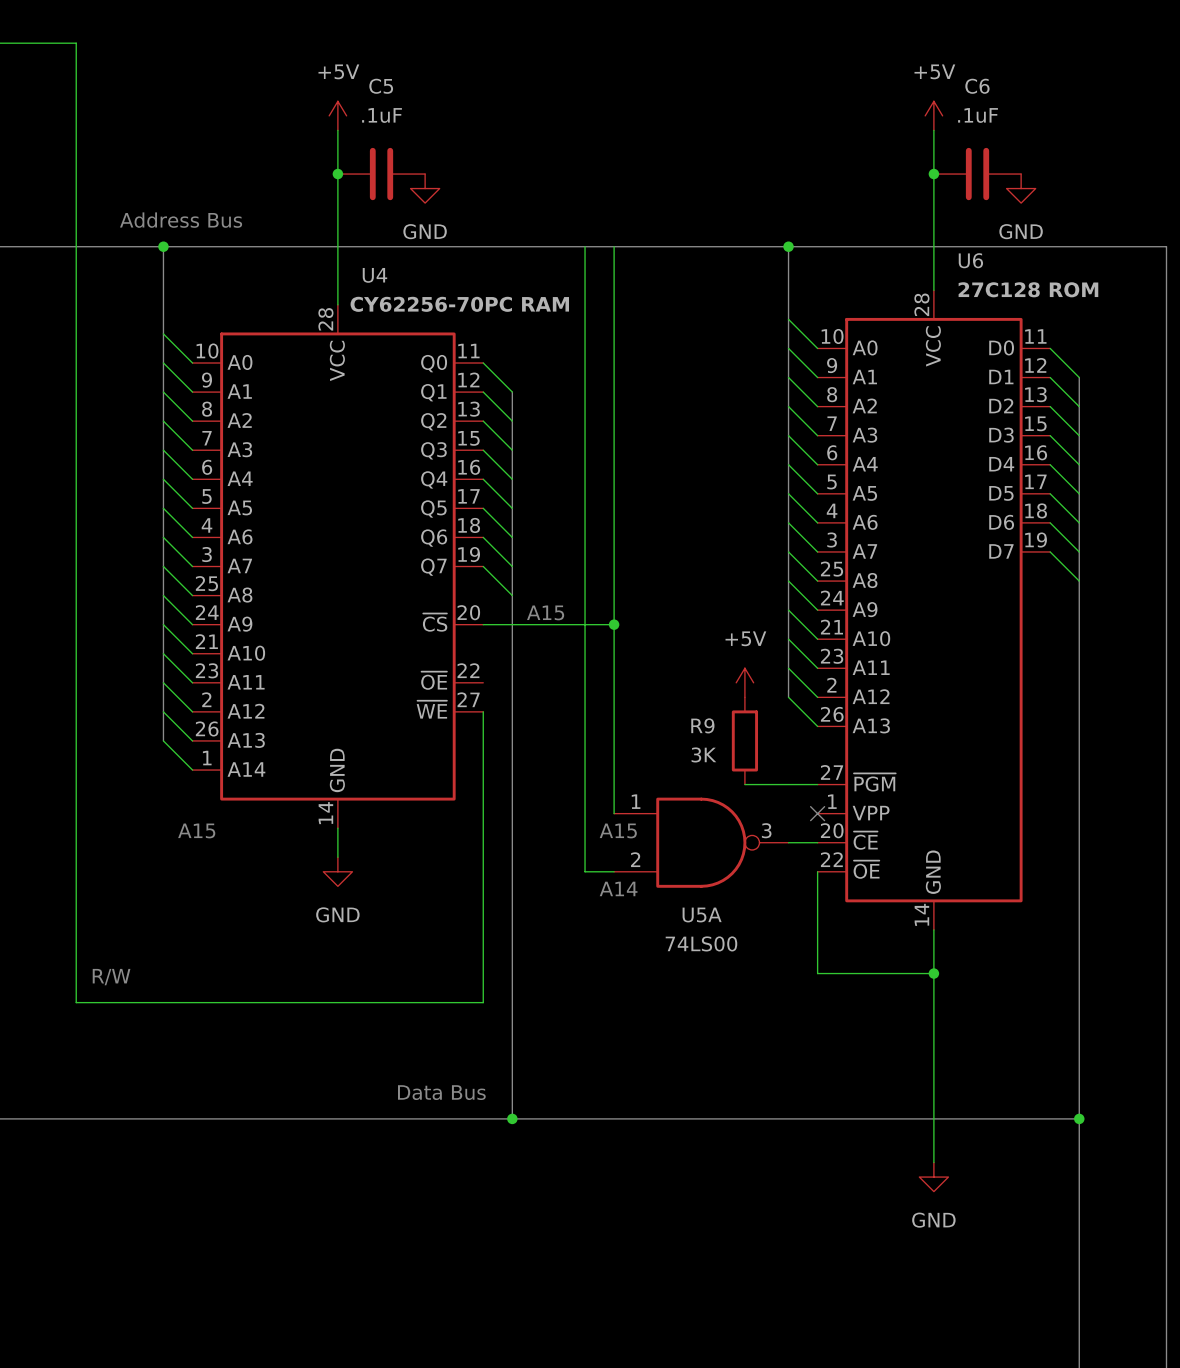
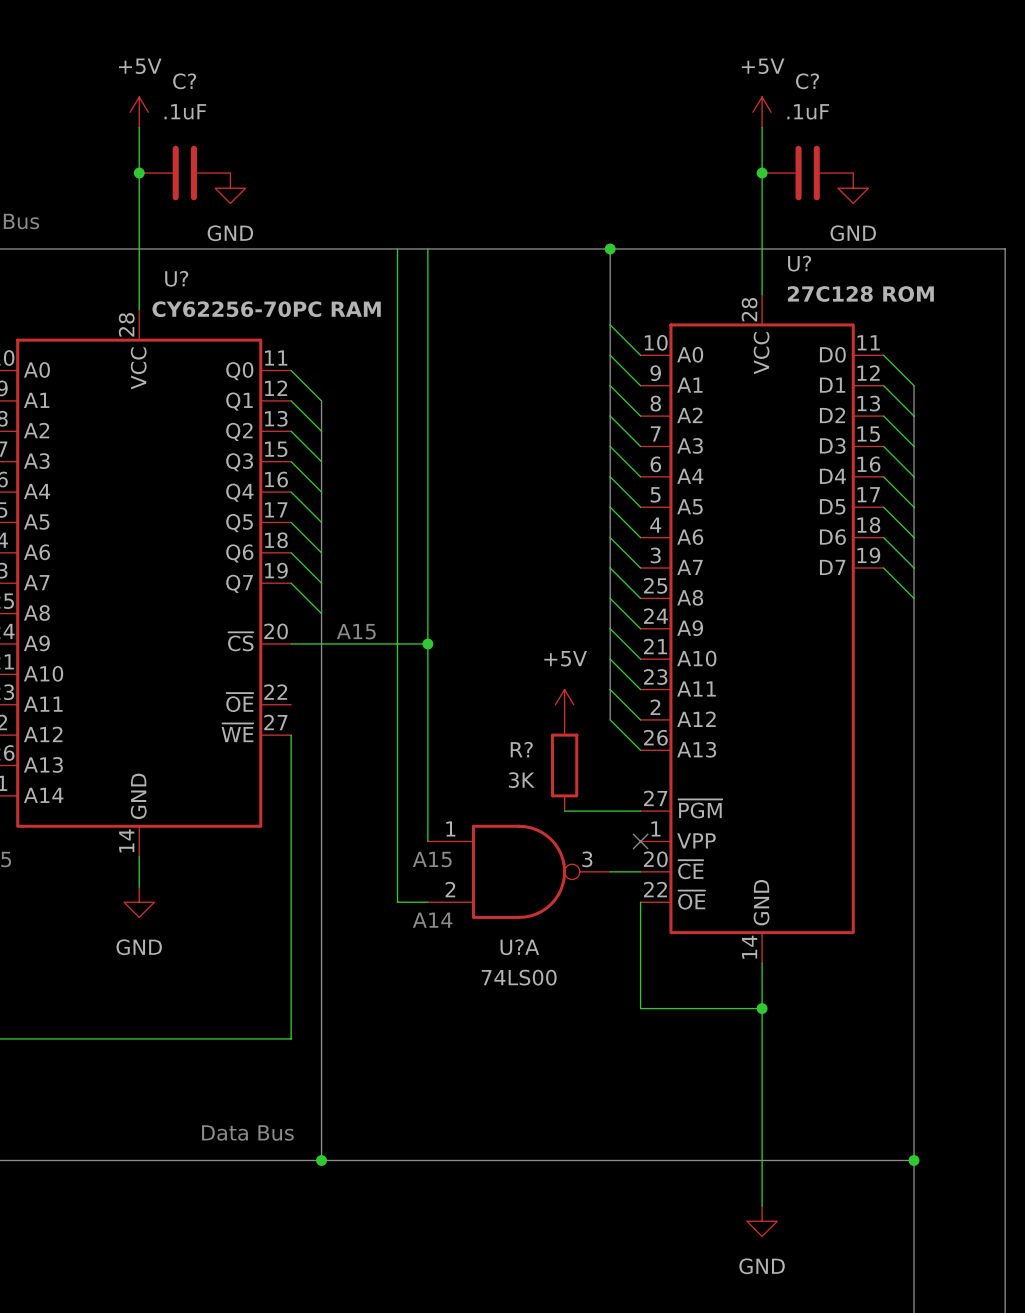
C5 name: C5 (381, 86) -> C? (184, 81)
C6 name: C6 (977, 86) -> C? (807, 81)
U6 name: U6 (970, 260) -> U? (799, 263)
U4 name: U4 (374, 275) -> U? (176, 278)
R9 name: R9 (702, 725) -> R? (521, 749)
U5A name: U5A (702, 915) -> U?A (519, 947)

